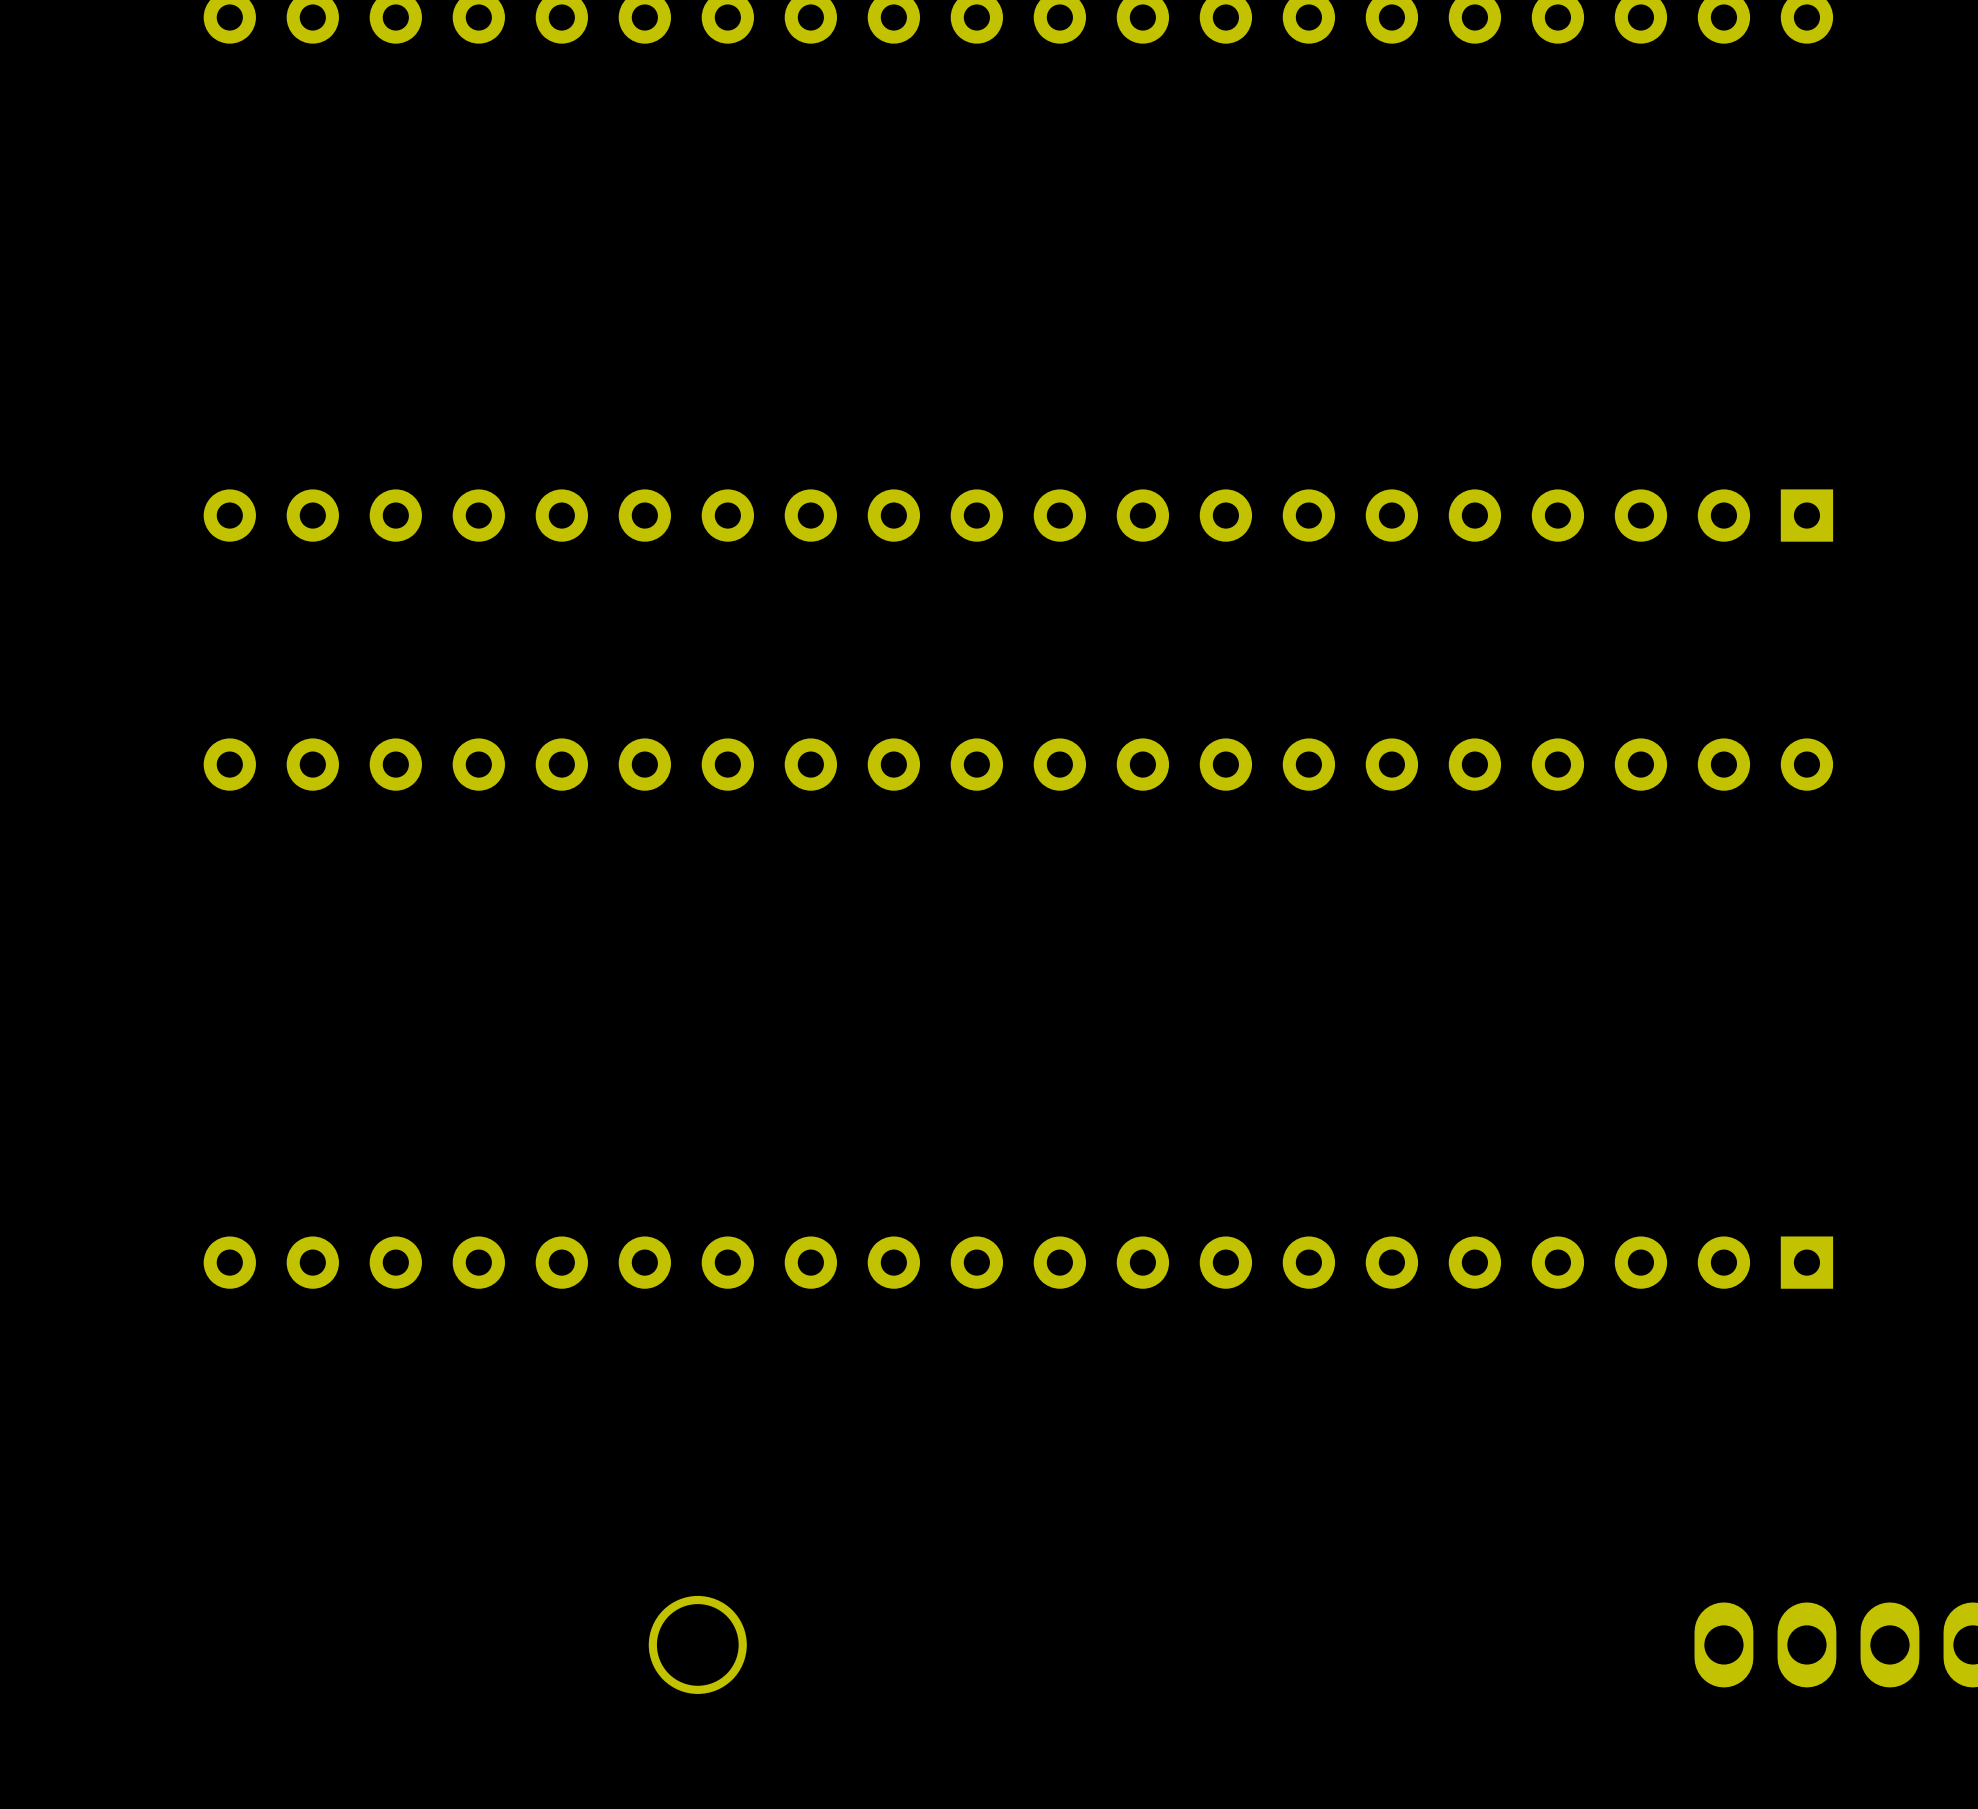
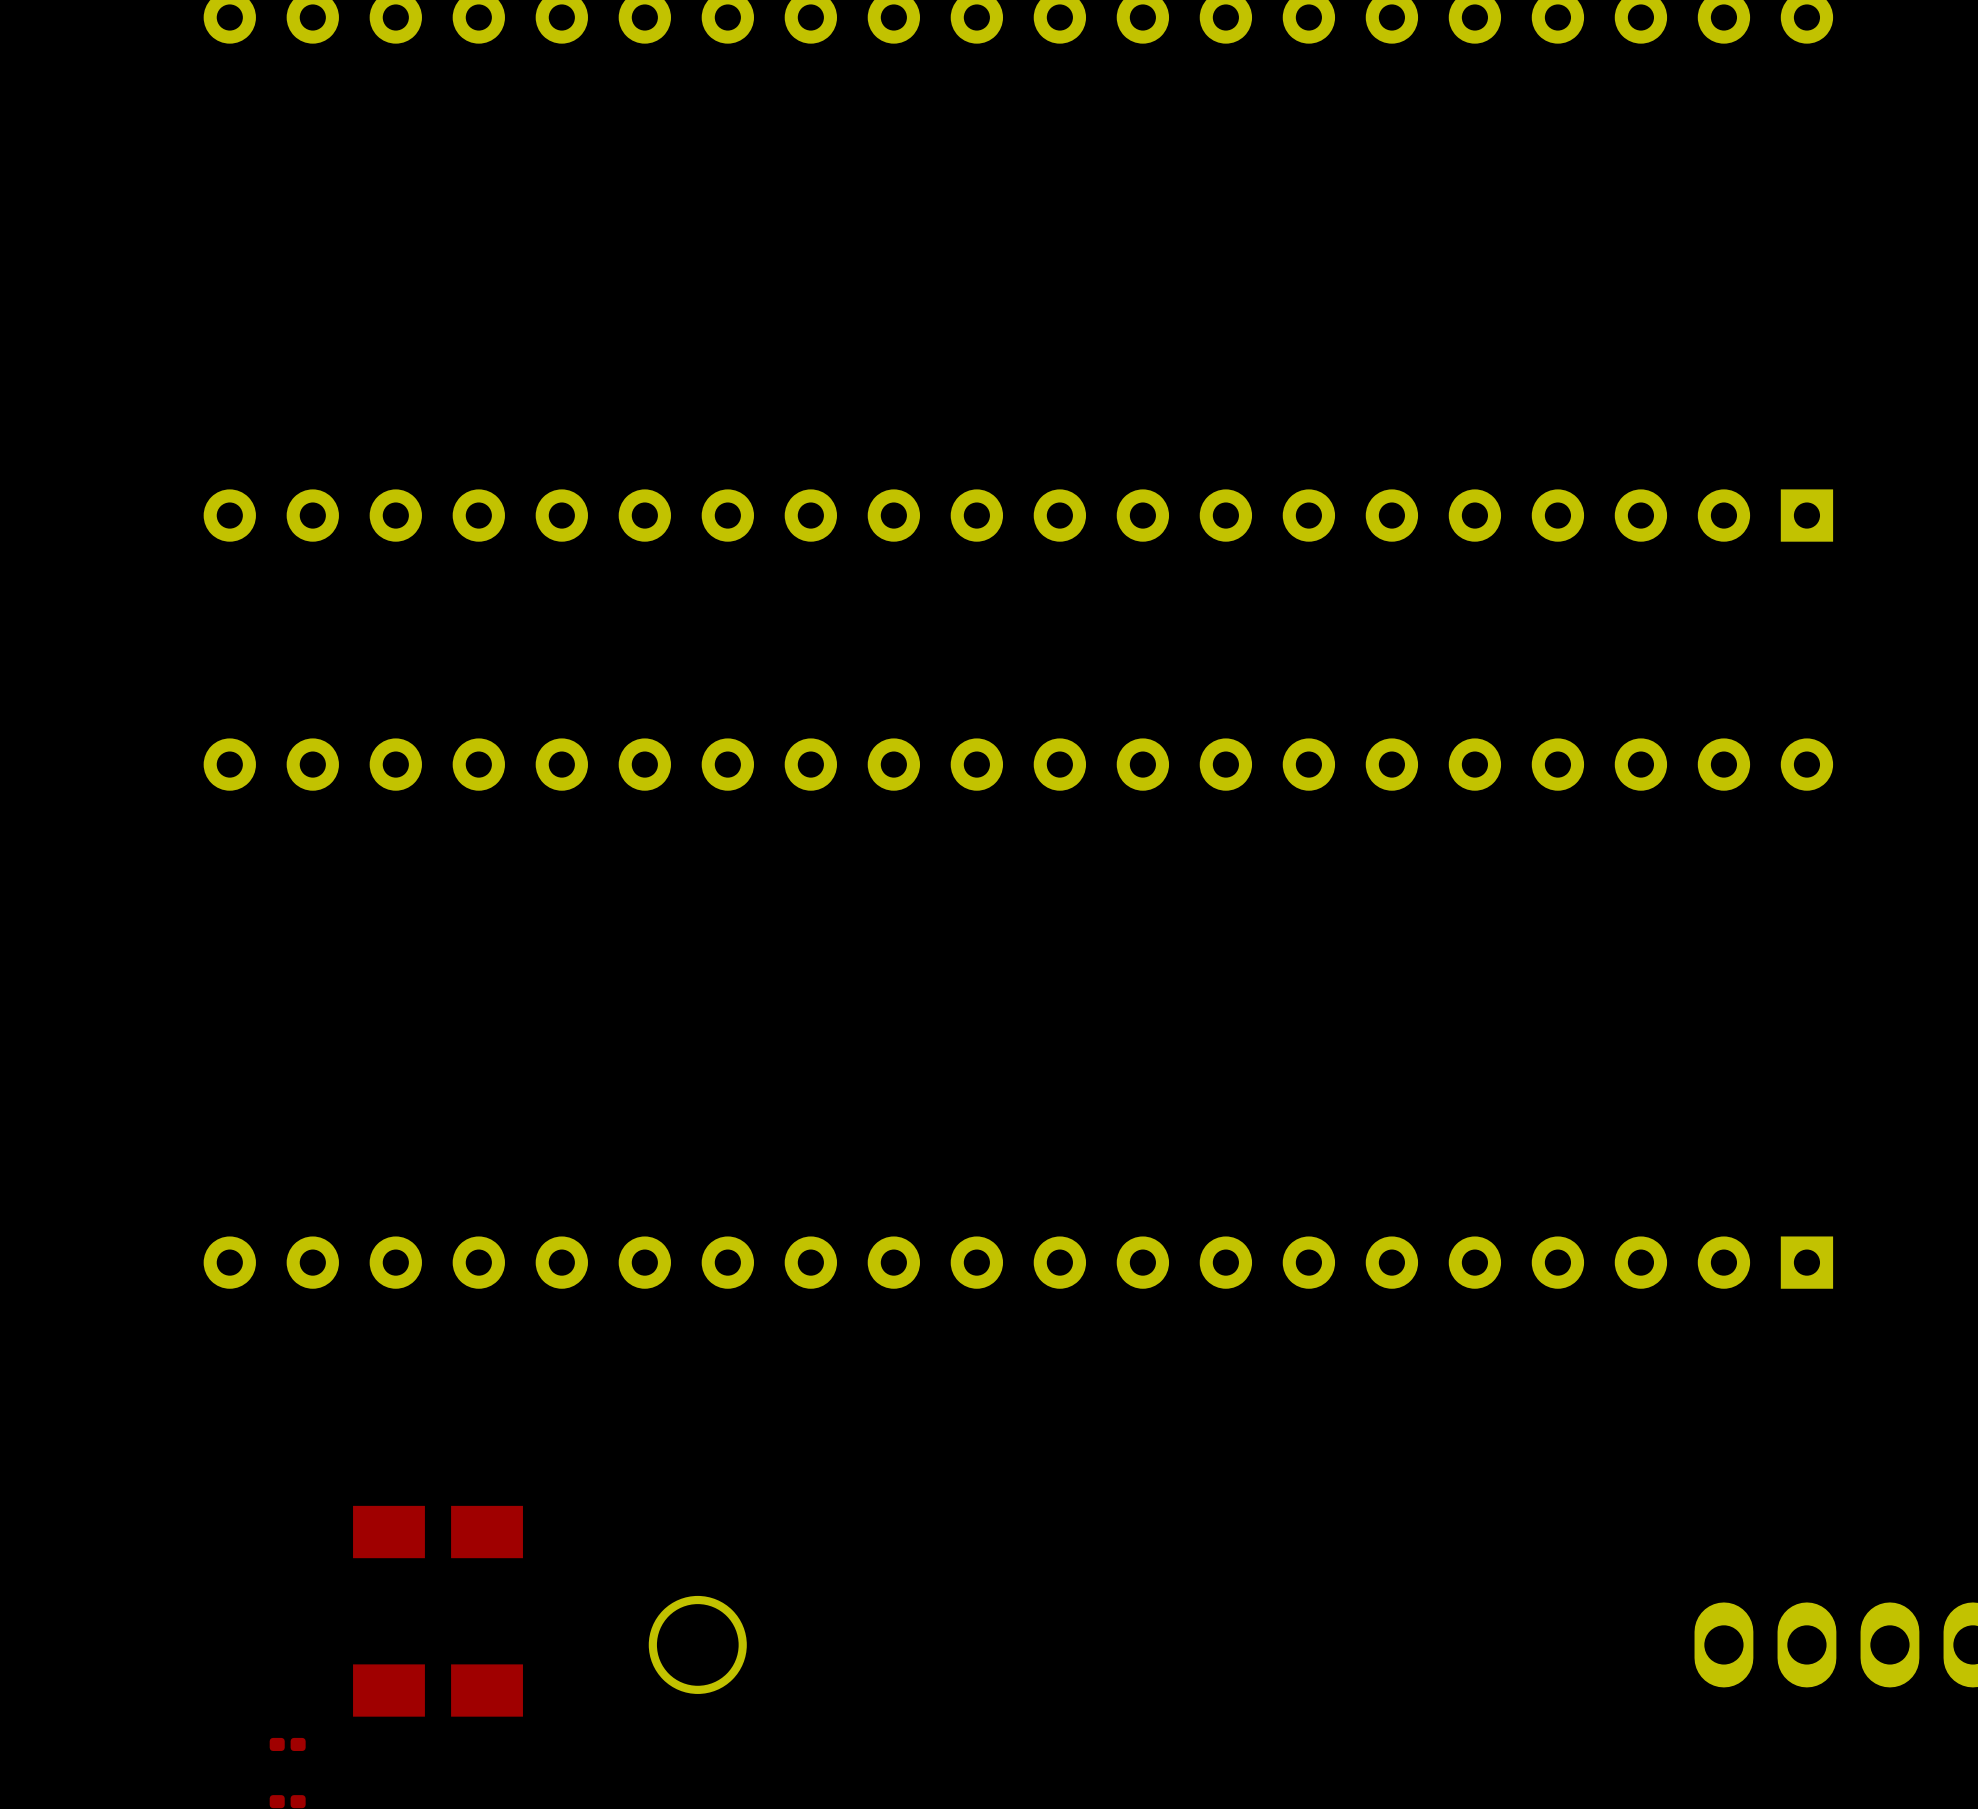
part: none -> (438, 1532)
part: none -> (438, 1690)
part: none -> (287, 1744)
part: none -> (287, 1801)

